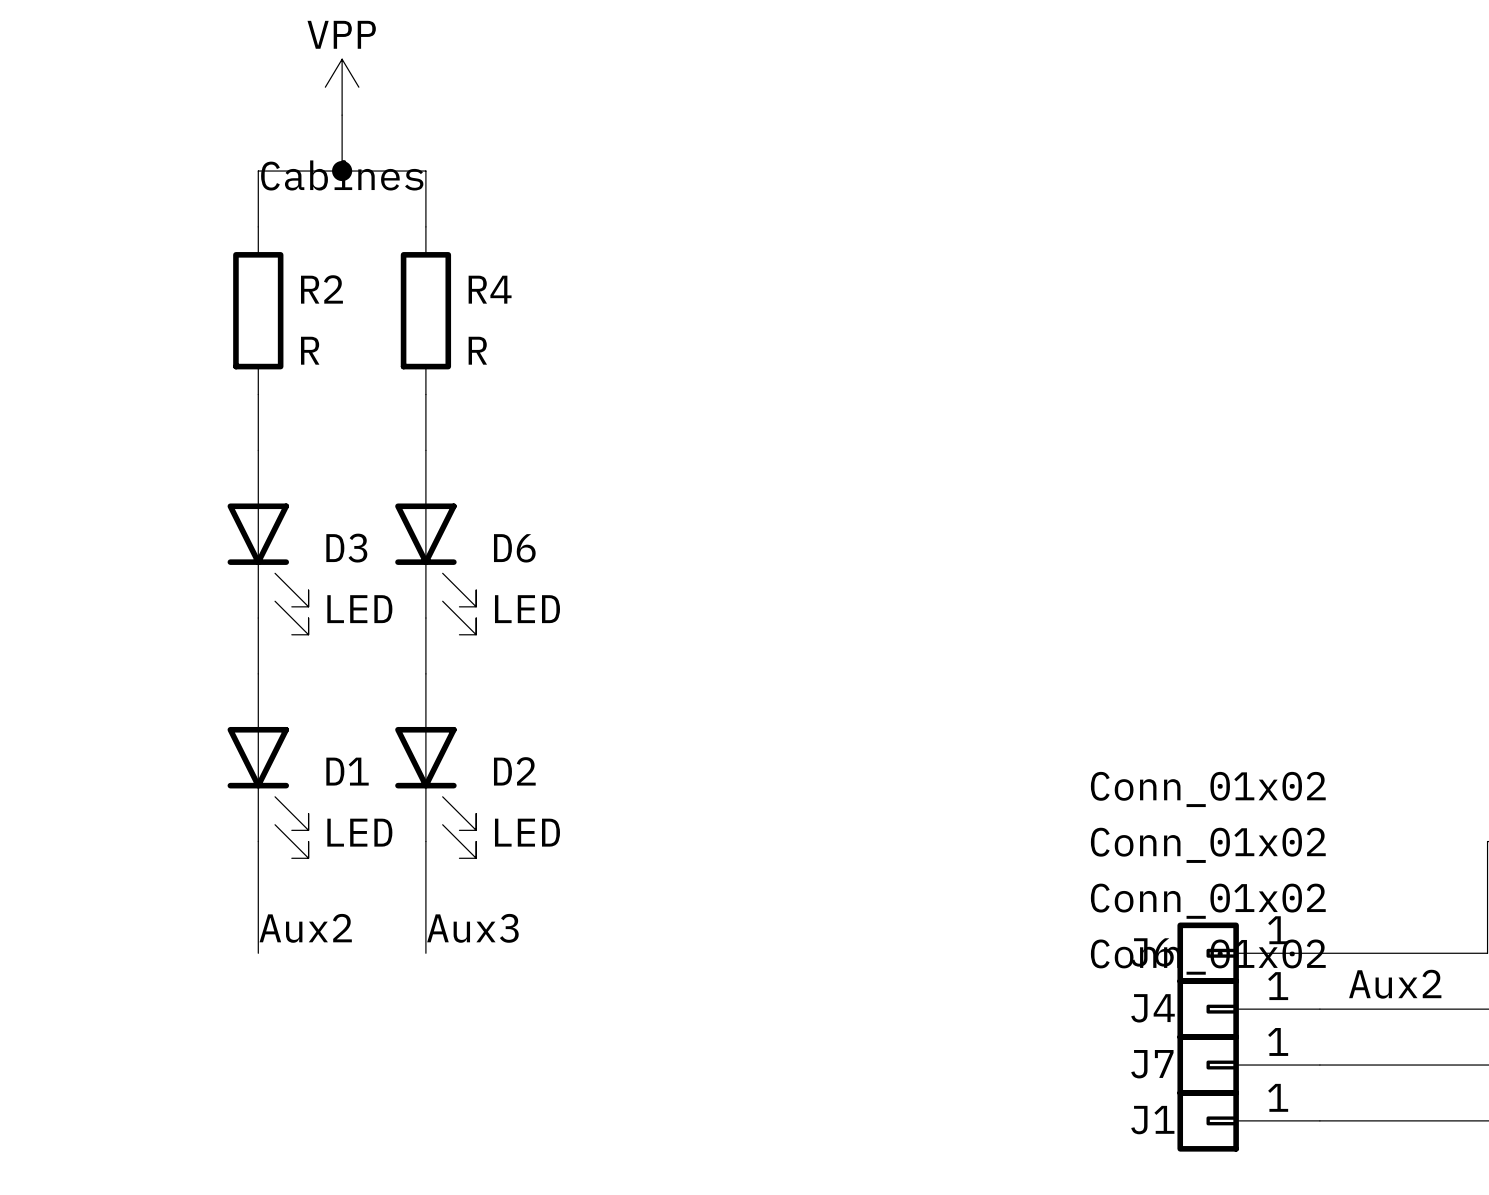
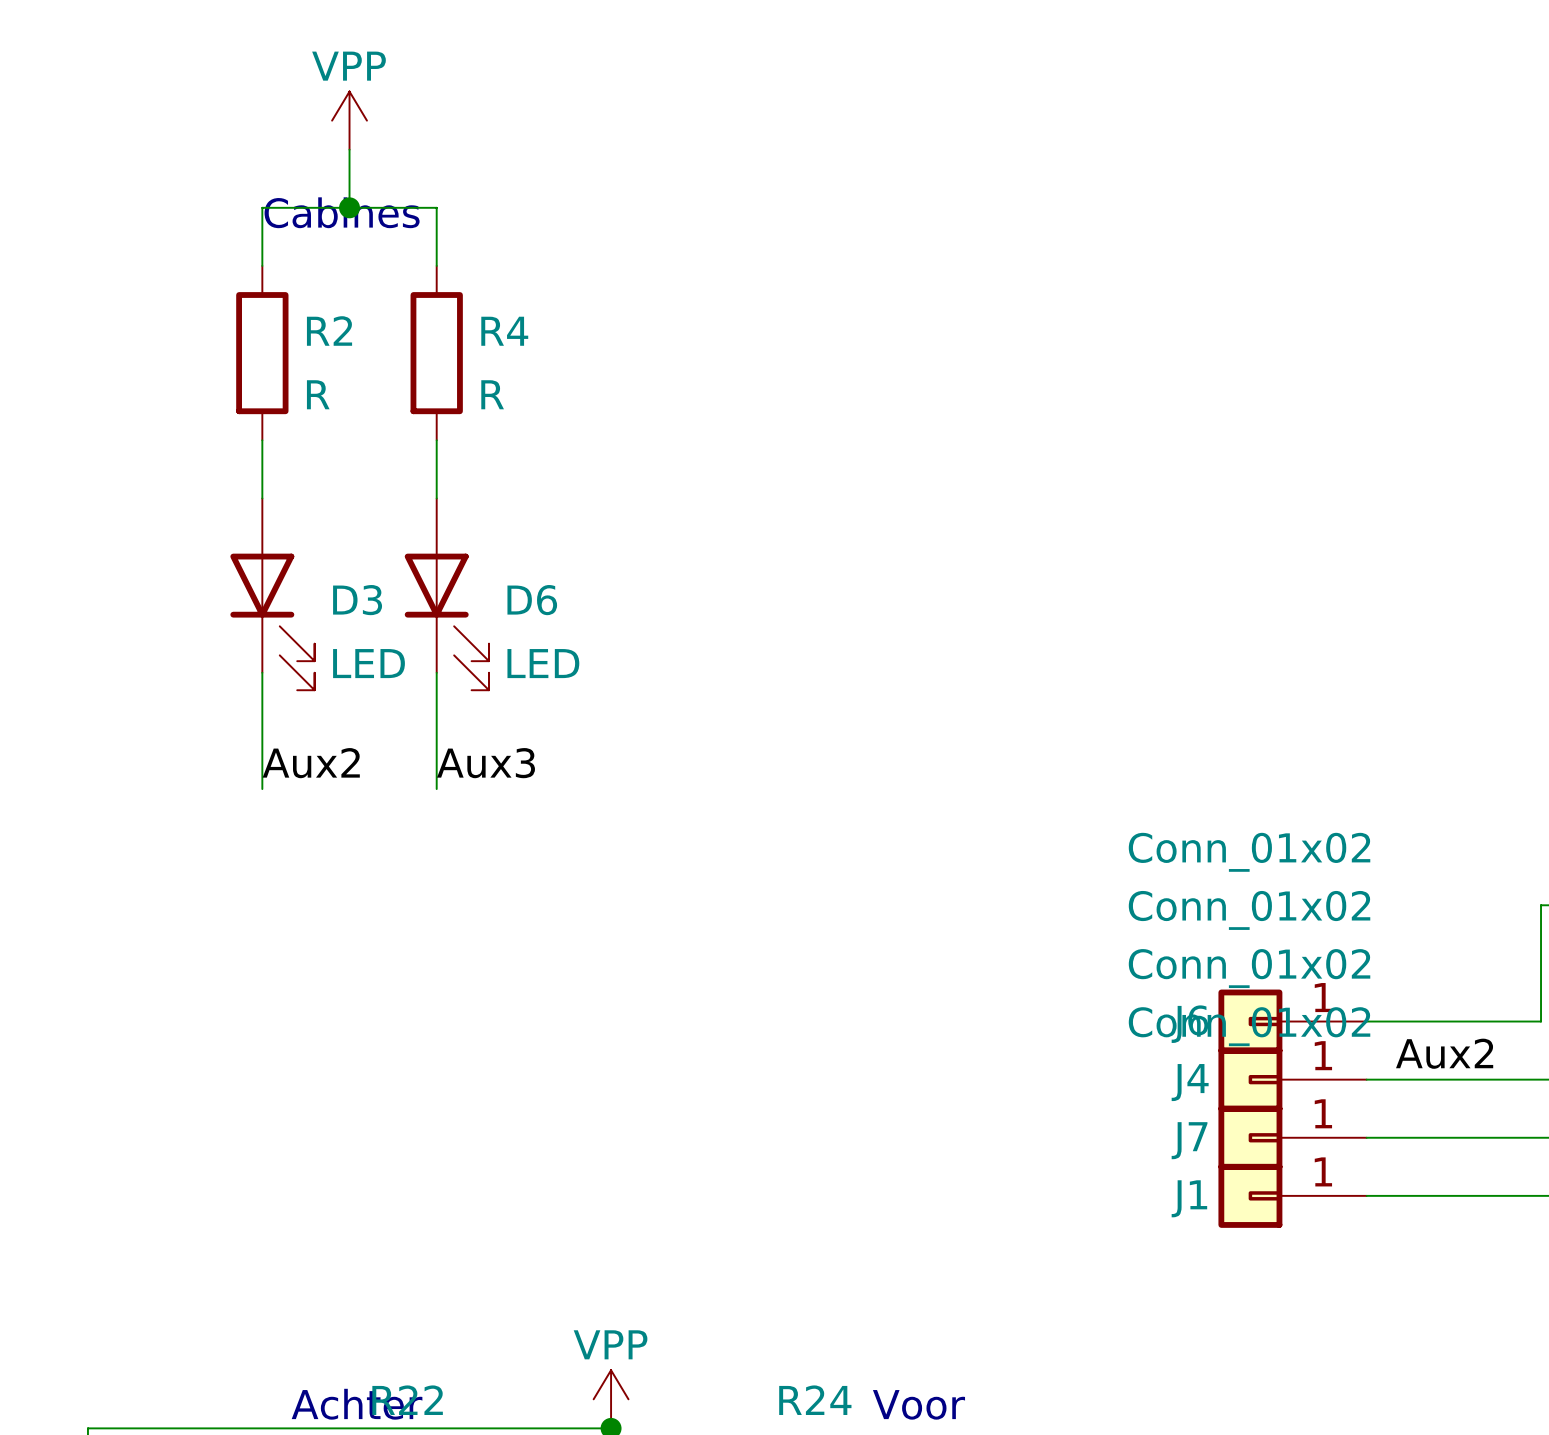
D1: LED (268, 766) -> none
D2: LED (435, 766) -> none
wire: (258, 841) (258, 953) -> none
wire: (425, 841) (425, 953) -> none
label position: Aux2 (305, 928) -> Aux2 (311, 763)
label position: Aux3 (472, 928) -> Aux3 (486, 763)

